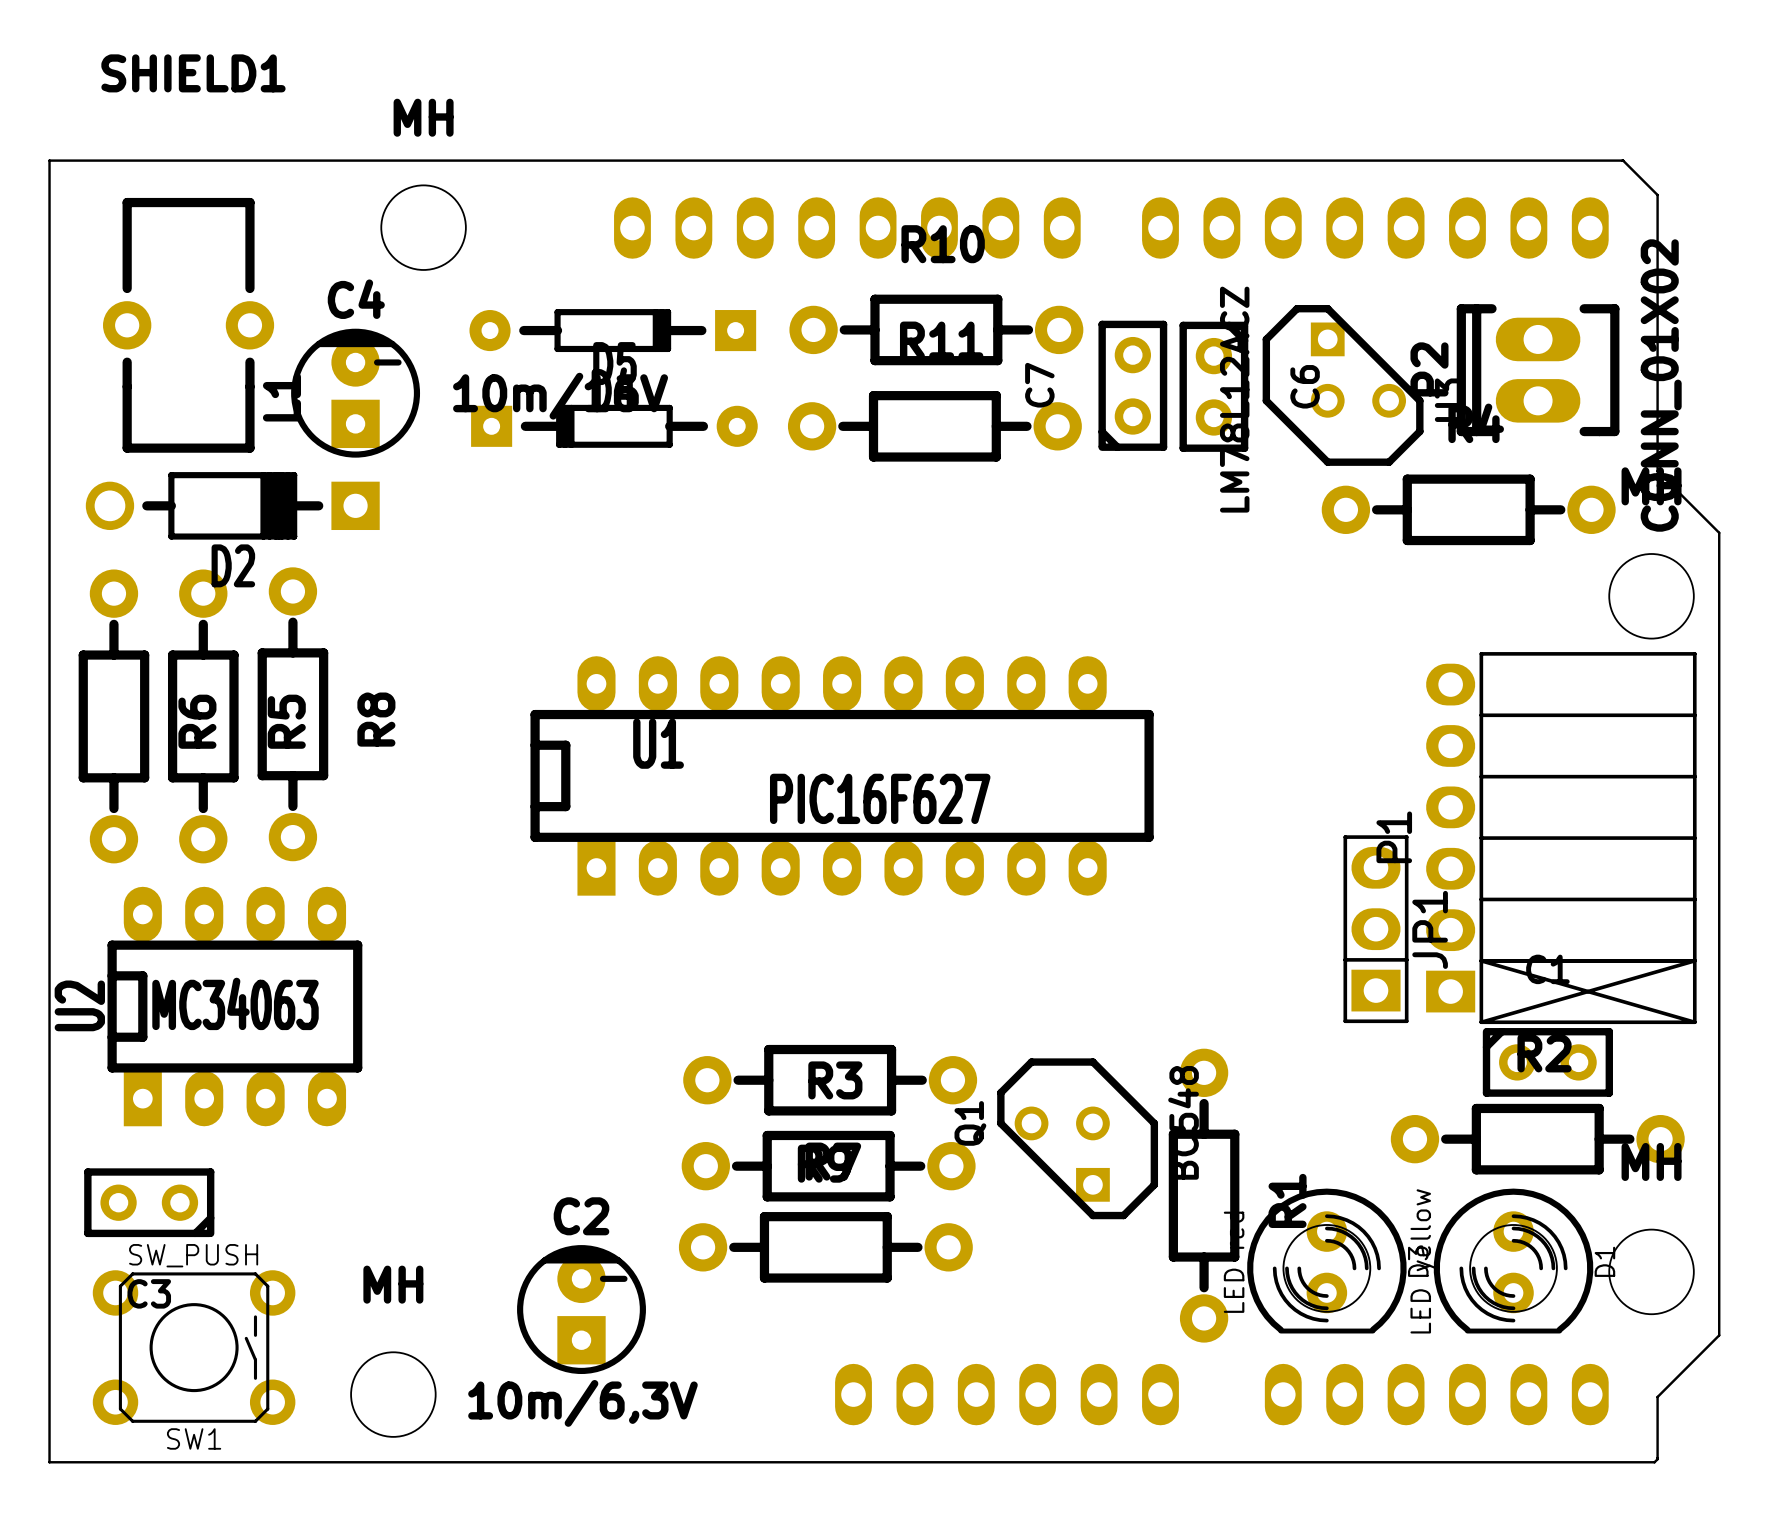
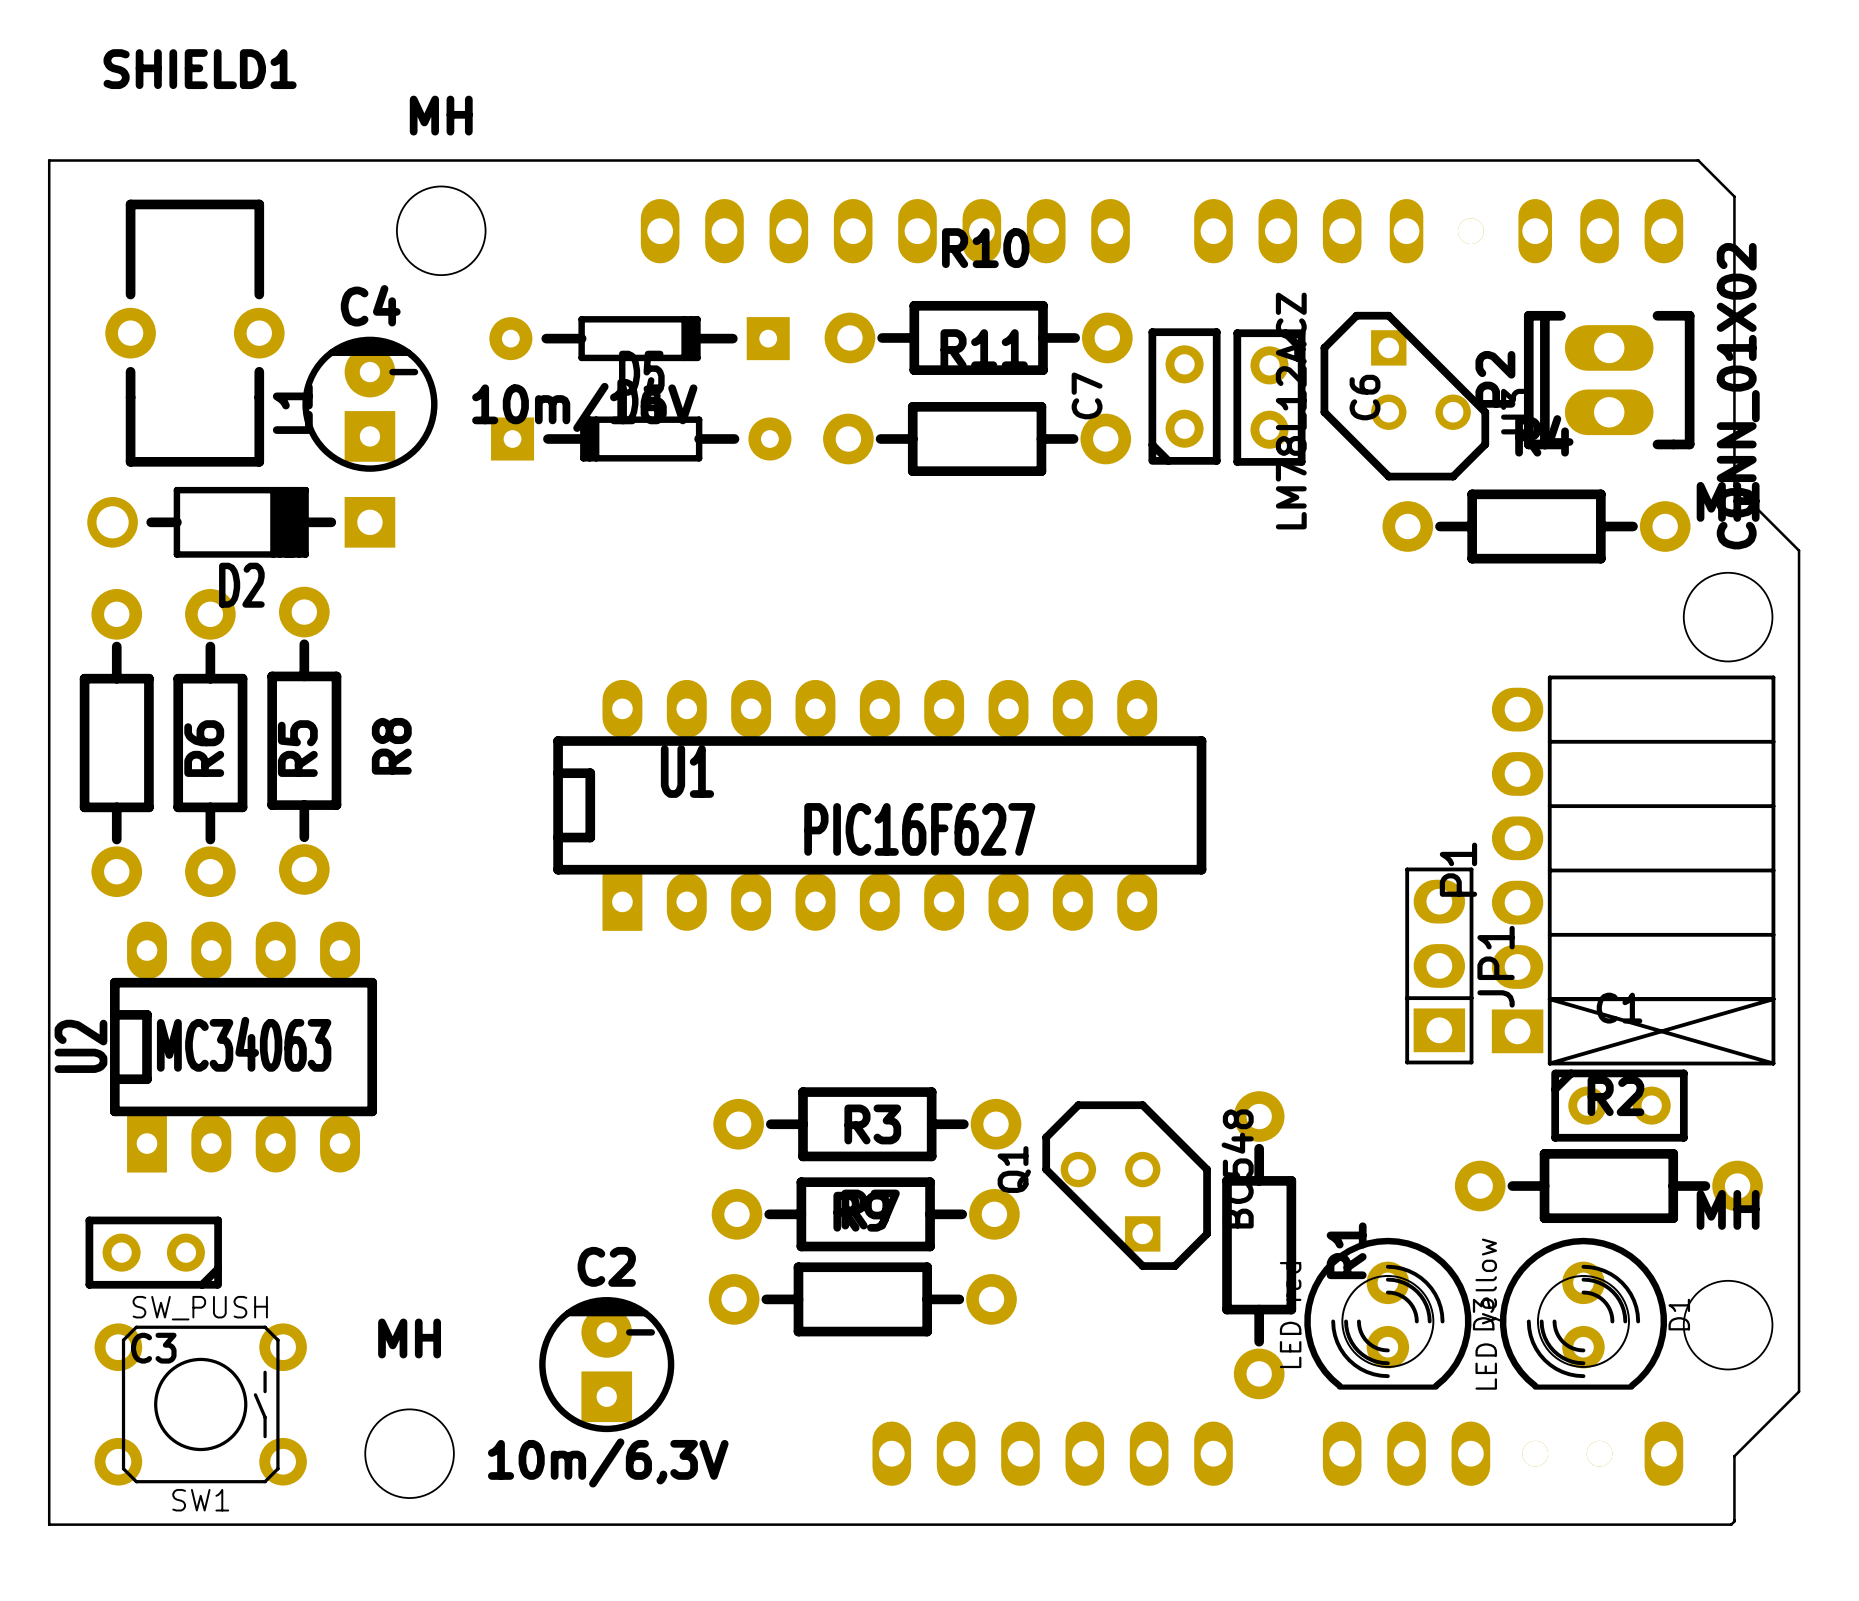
SHIELD1 footprint: [614, 197, 1609, 1426] -> [640, 198, 1684, 1486]

